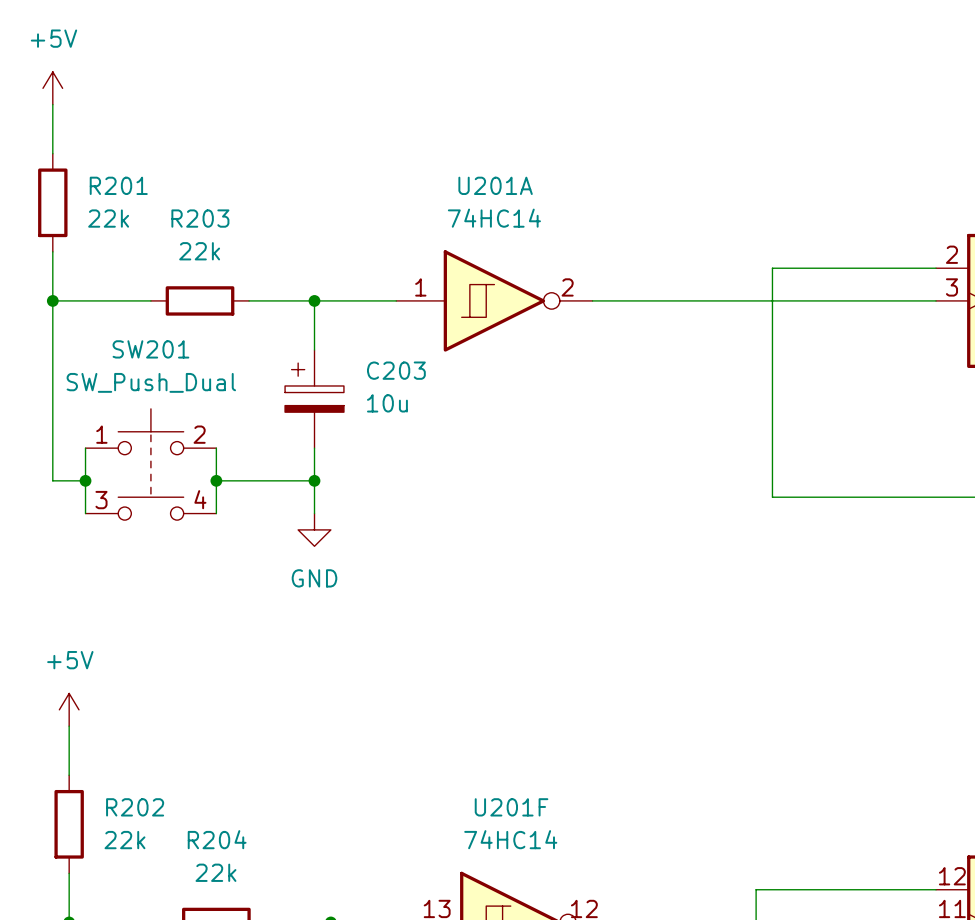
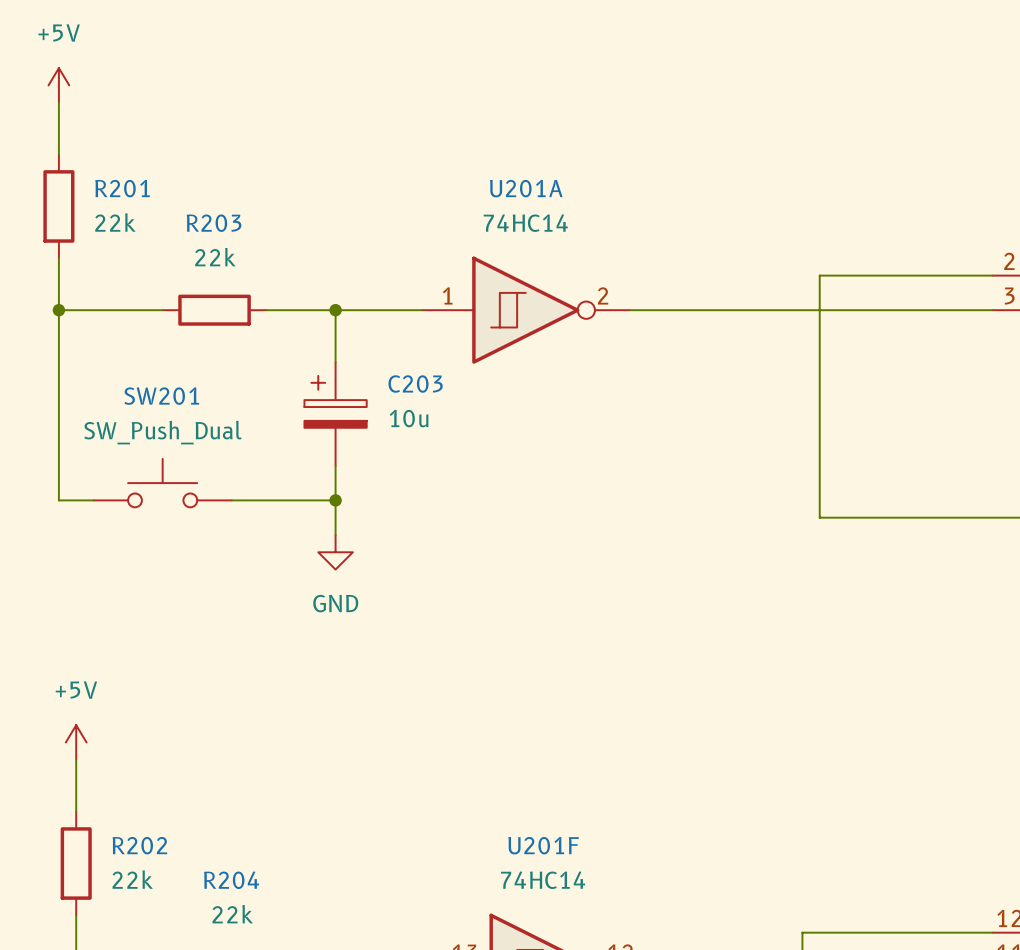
SW201 name position: SW201 (150, 349) -> SW201 (161, 396)
SW201 value position: SW_Push_Dual (151, 382) -> SW_Push_Dual (162, 432)
SW201 symbol: [85, 408, 217, 521] -> [93, 458, 232, 508]
wire: (85, 448) (85, 513) -> none
wire: (216, 448) (216, 513) -> none
junction: (85, 480) -> none
junction: (216, 480) -> none

